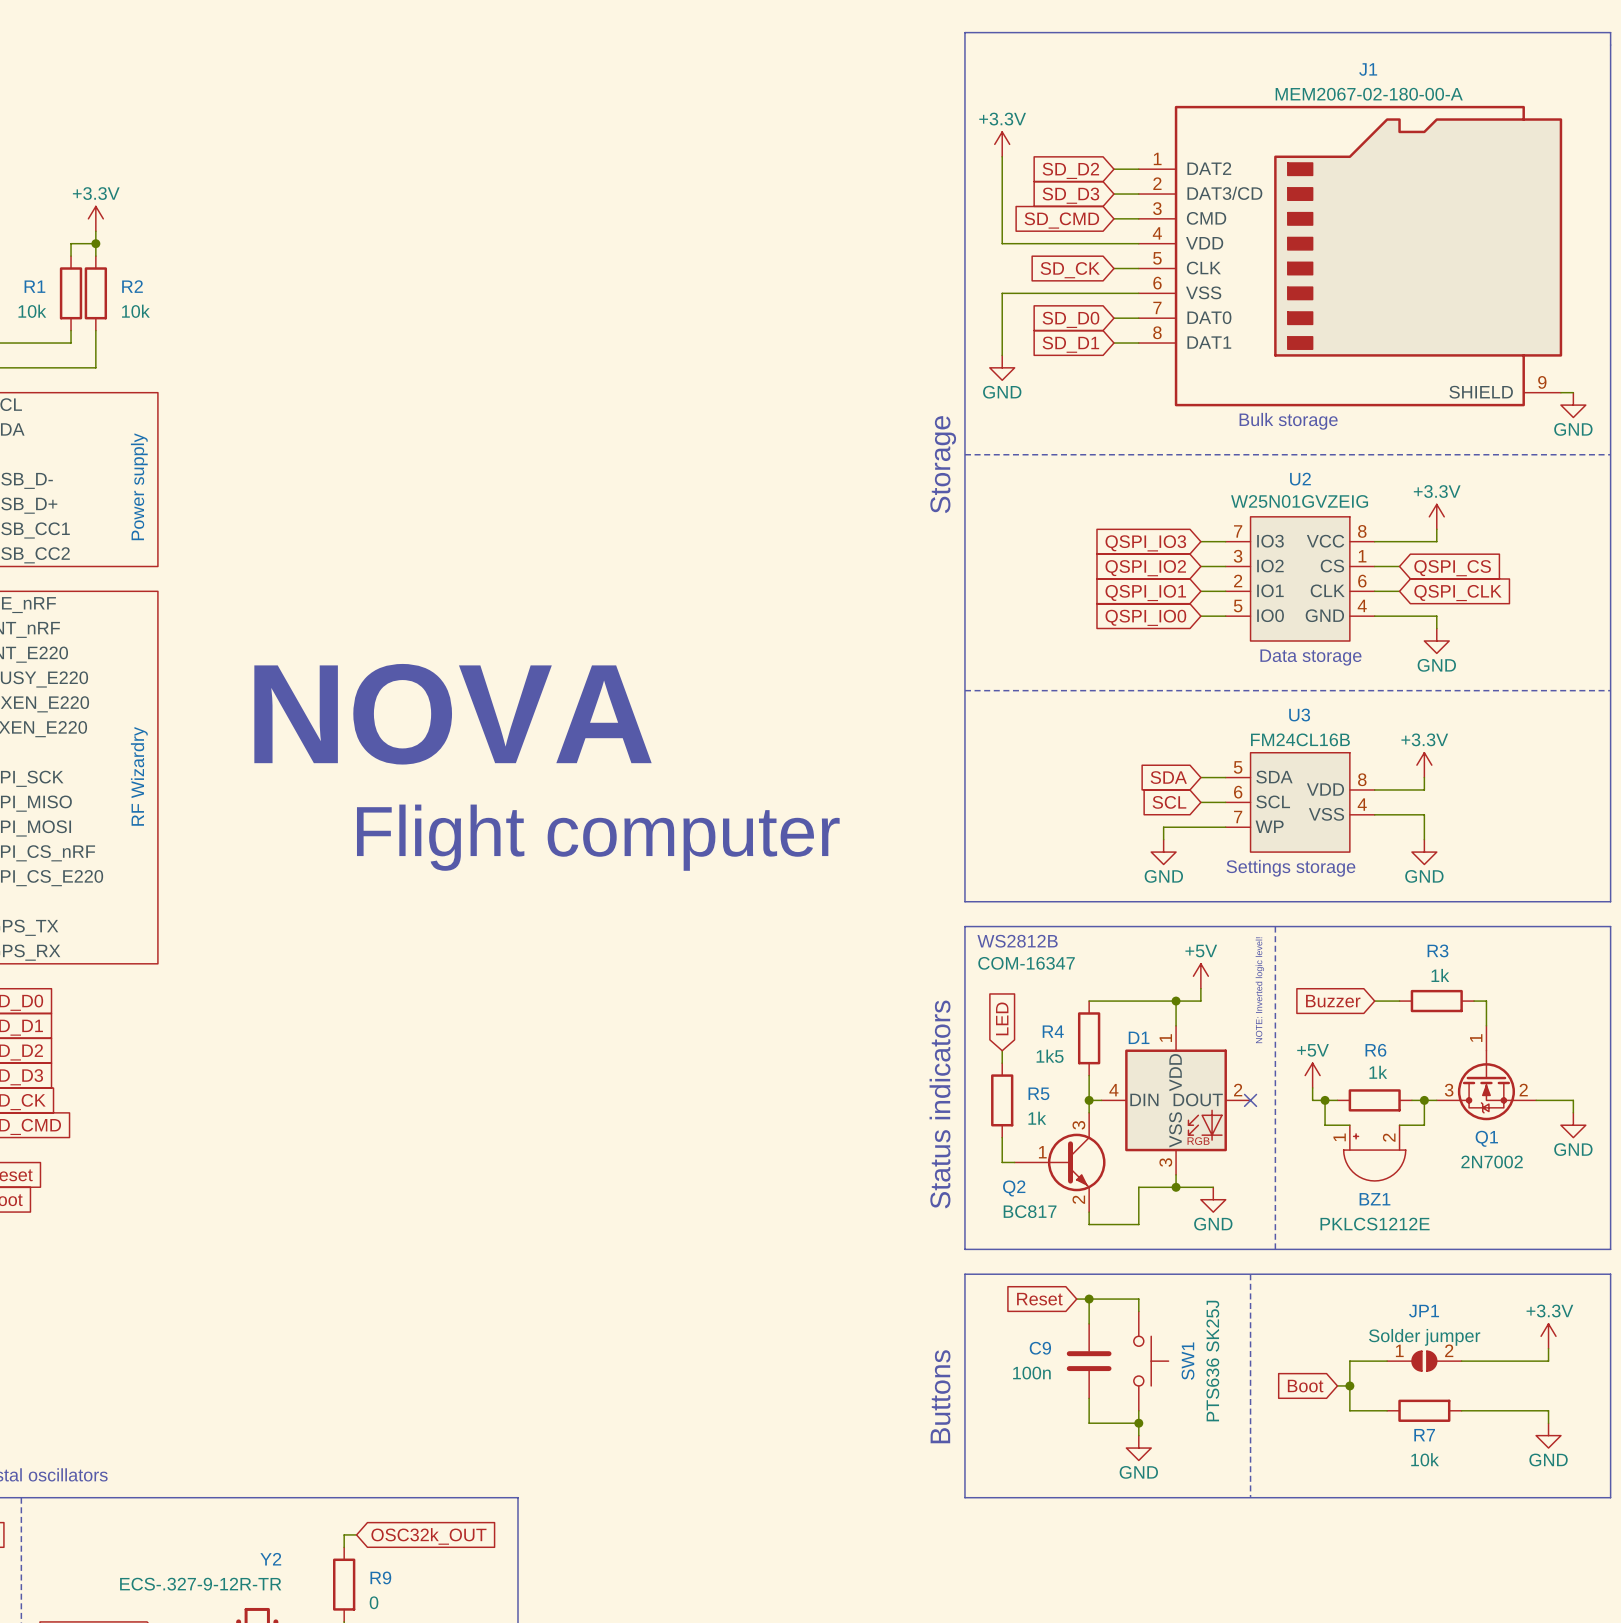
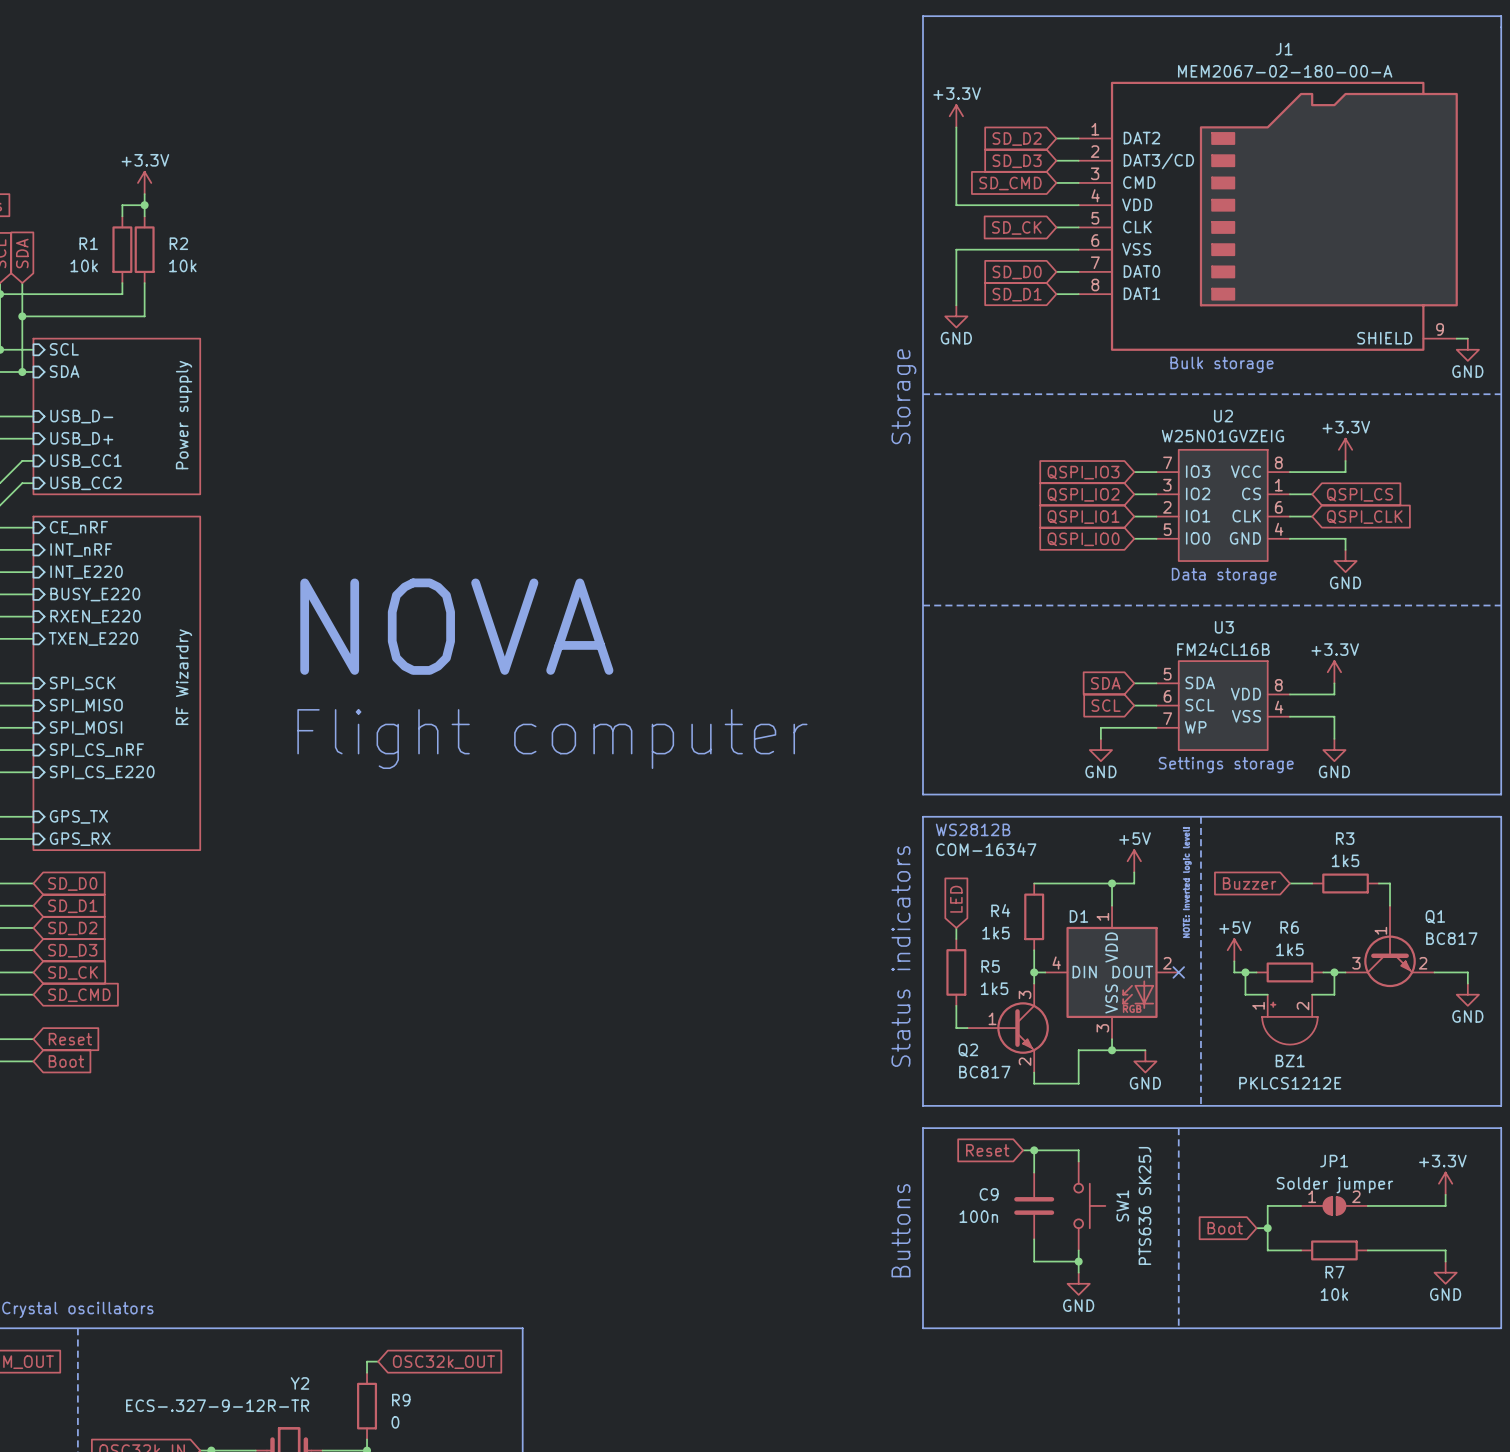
R3 value: 1k (1440, 975) -> 1k5 (1345, 860)
Q1 symbol: [1436, 1025, 1537, 1121] -> [1345, 905, 1435, 988]
R6 value: 1k (1378, 1072) -> 1k5 (1289, 949)
R5 value: 1k (1037, 1118) -> 1k5 (994, 988)
Q1 name position: Q1 (1486, 1138) -> Q1 (1435, 916)
Q1 value: 2N7002 (1492, 1162) -> BC817 (1451, 938)

